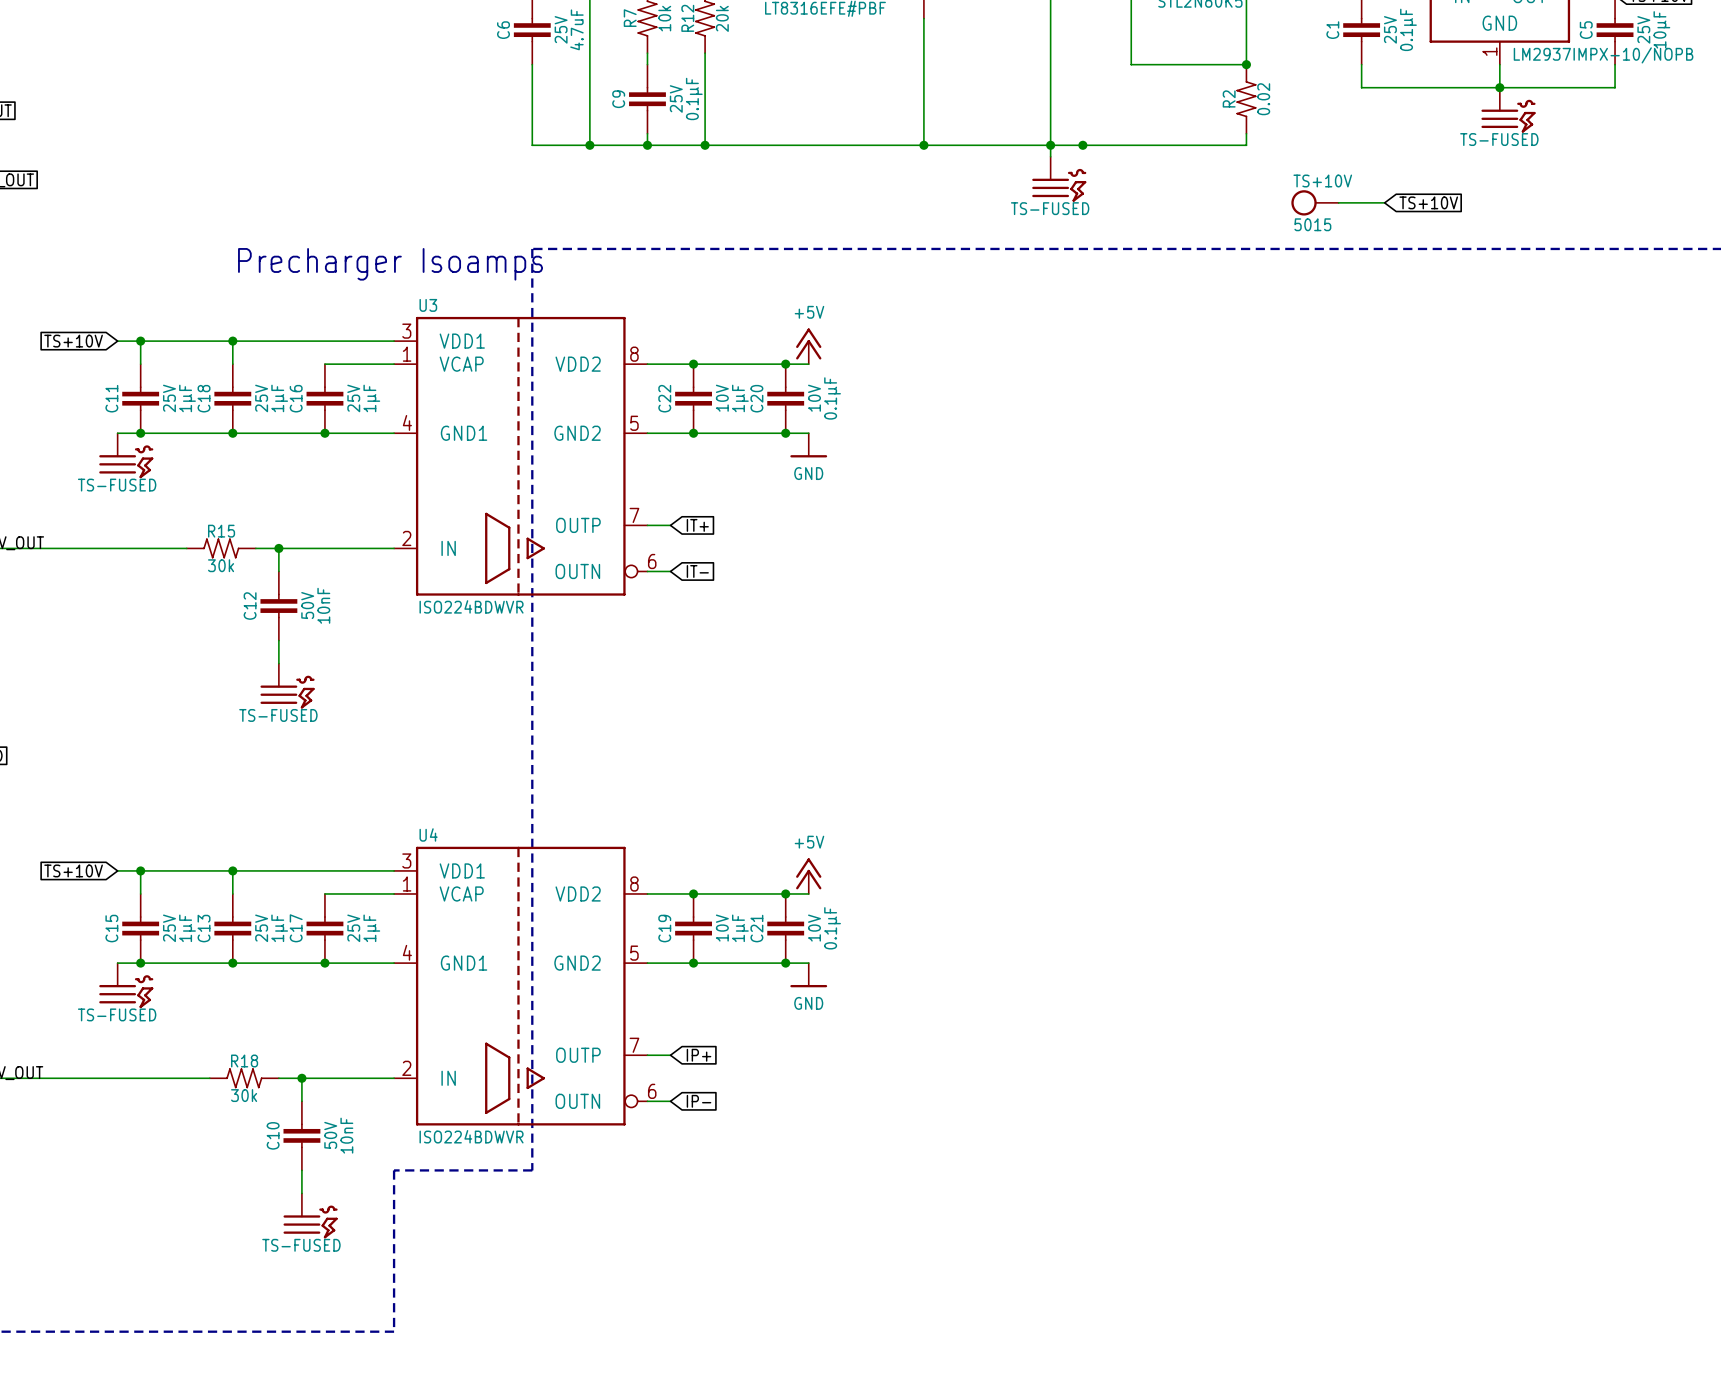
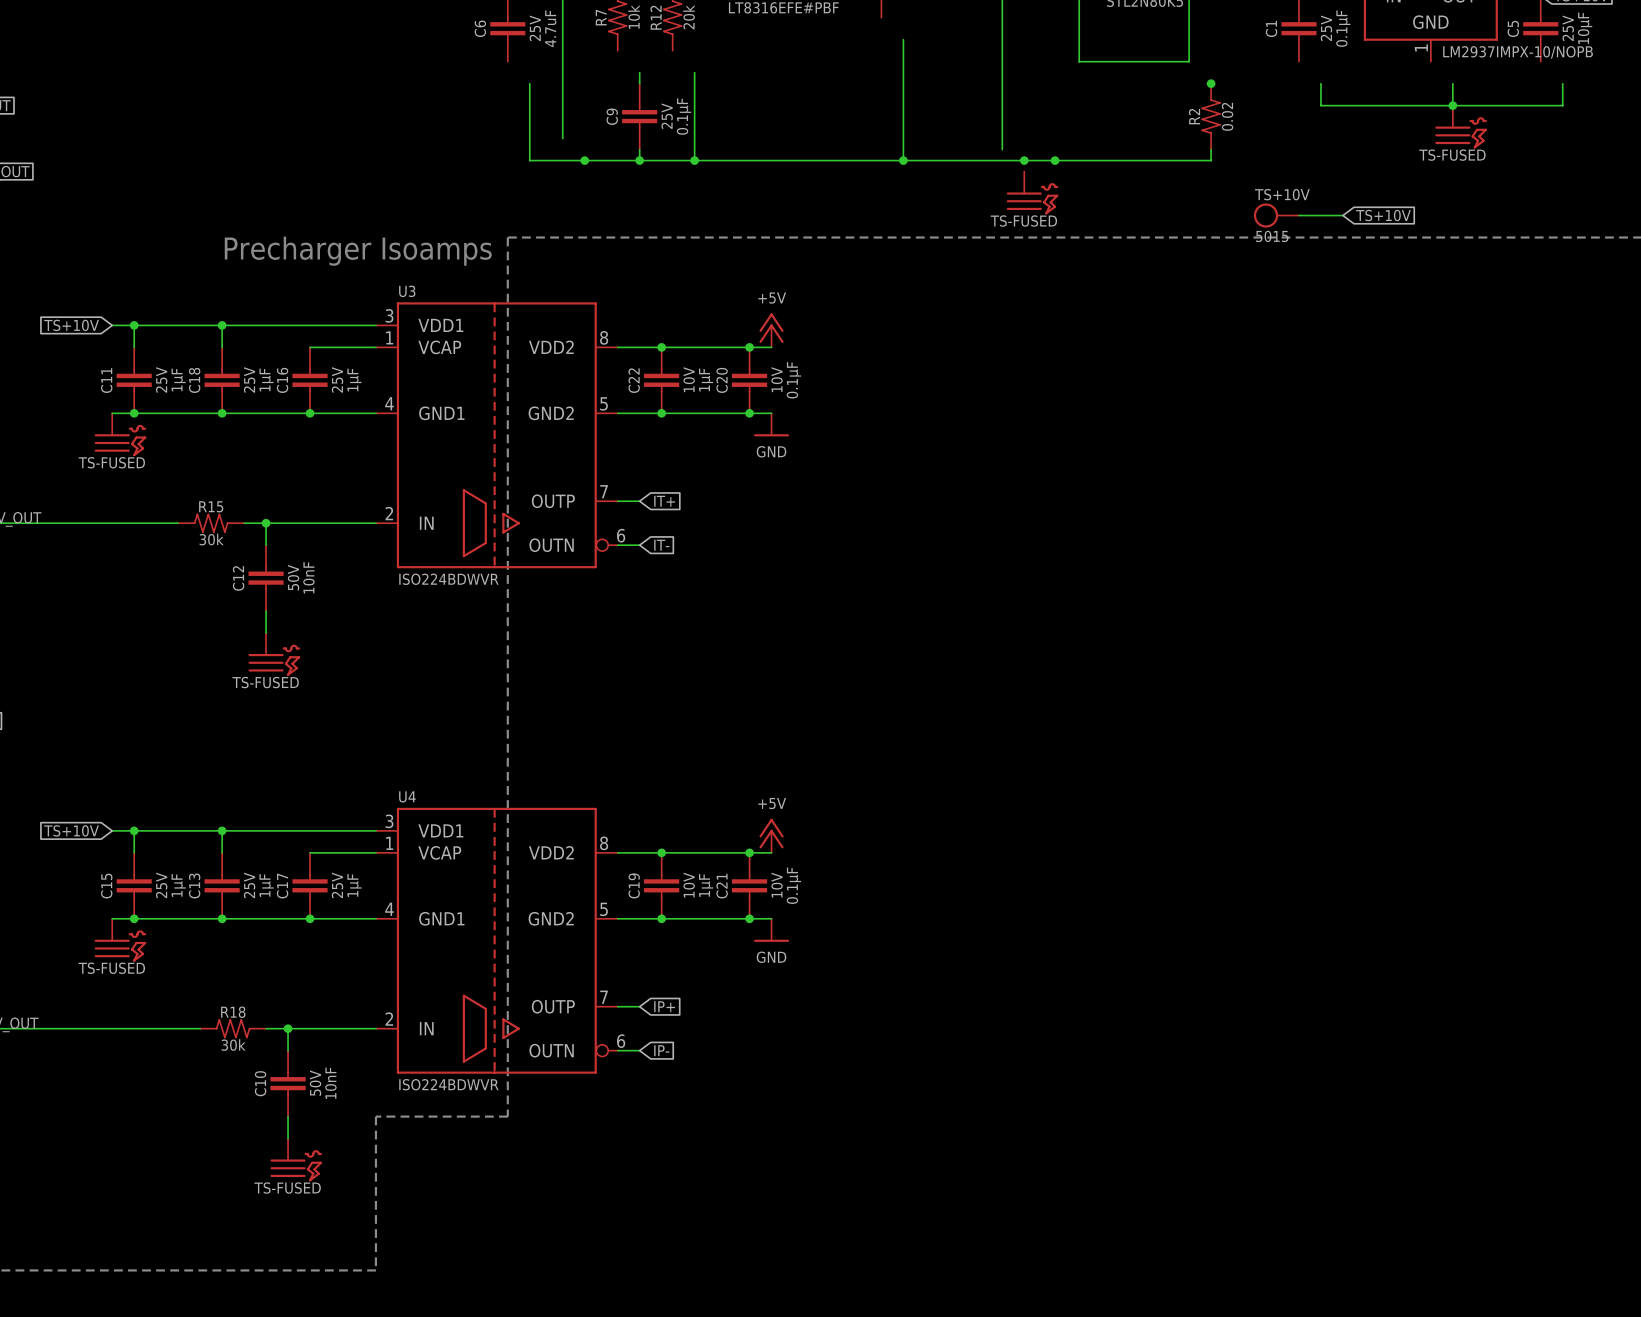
wire: (923, 18) (923, 145) -> (903, 39) (903, 160)
wire: (647, 53) (647, 64) -> (639, 72) (639, 83)
wire: (705, 53) (705, 145) -> (694, 72) (694, 160)
wire: (532, 64) (532, 145) (1246, 145) (1246, 133) -> (529, 83) (529, 160) (1211, 160) (1211, 149)
junction position: (1246, 64) -> (1211, 83)
wire: (1361, 64) (1361, 87) (1615, 87) (1615, 64) -> (1320, 83) (1320, 105) (1562, 105) (1562, 83)
wire: (1499, 64) (1499, 87) -> (1452, 83) (1452, 105)
junction position: (1499, 87) -> (1452, 105)
C9 position: (647, 99) -> (639, 116)
R2 position: (1246, 99) -> (1211, 116)
power symbol position: TS-FUSED (1508, 110) -> TS-FUSED (1461, 127)
wire: (647, 133) (647, 145) -> (639, 149) (639, 160)
junction: (589, 145) -> none
junction: (647, 145) -> none
junction: (705, 145) -> none
junction position: (923, 145) -> (903, 160)
junction: (1050, 145) -> none
junction: (1082, 145) -> none
junction: none -> (584, 160)
junction: none -> (639, 160)
junction: none -> (694, 160)
junction: none -> (1024, 160)
junction: none -> (1055, 160)
power symbol position: TS-FUSED (1059, 179) -> TS-FUSED (1032, 193)
TS+10V position: (1314, 202) -> (1276, 215)
wire: (1338, 202) (1384, 202) -> (1298, 215) (1342, 215)
global label position: TS+10V (1428, 202) -> TS+10V (1383, 215)

